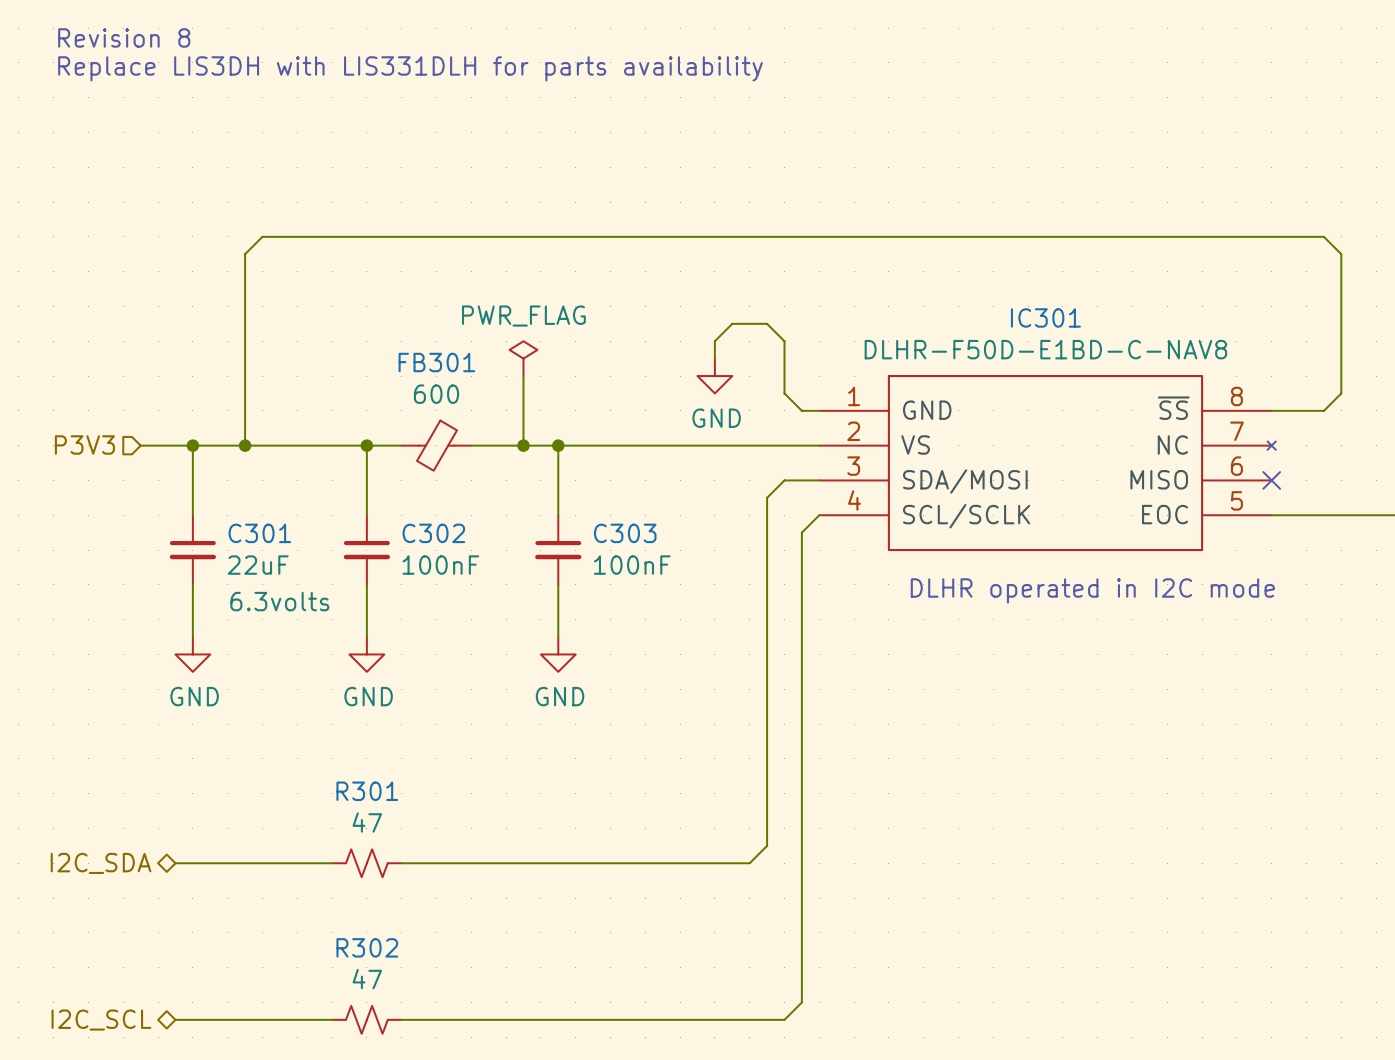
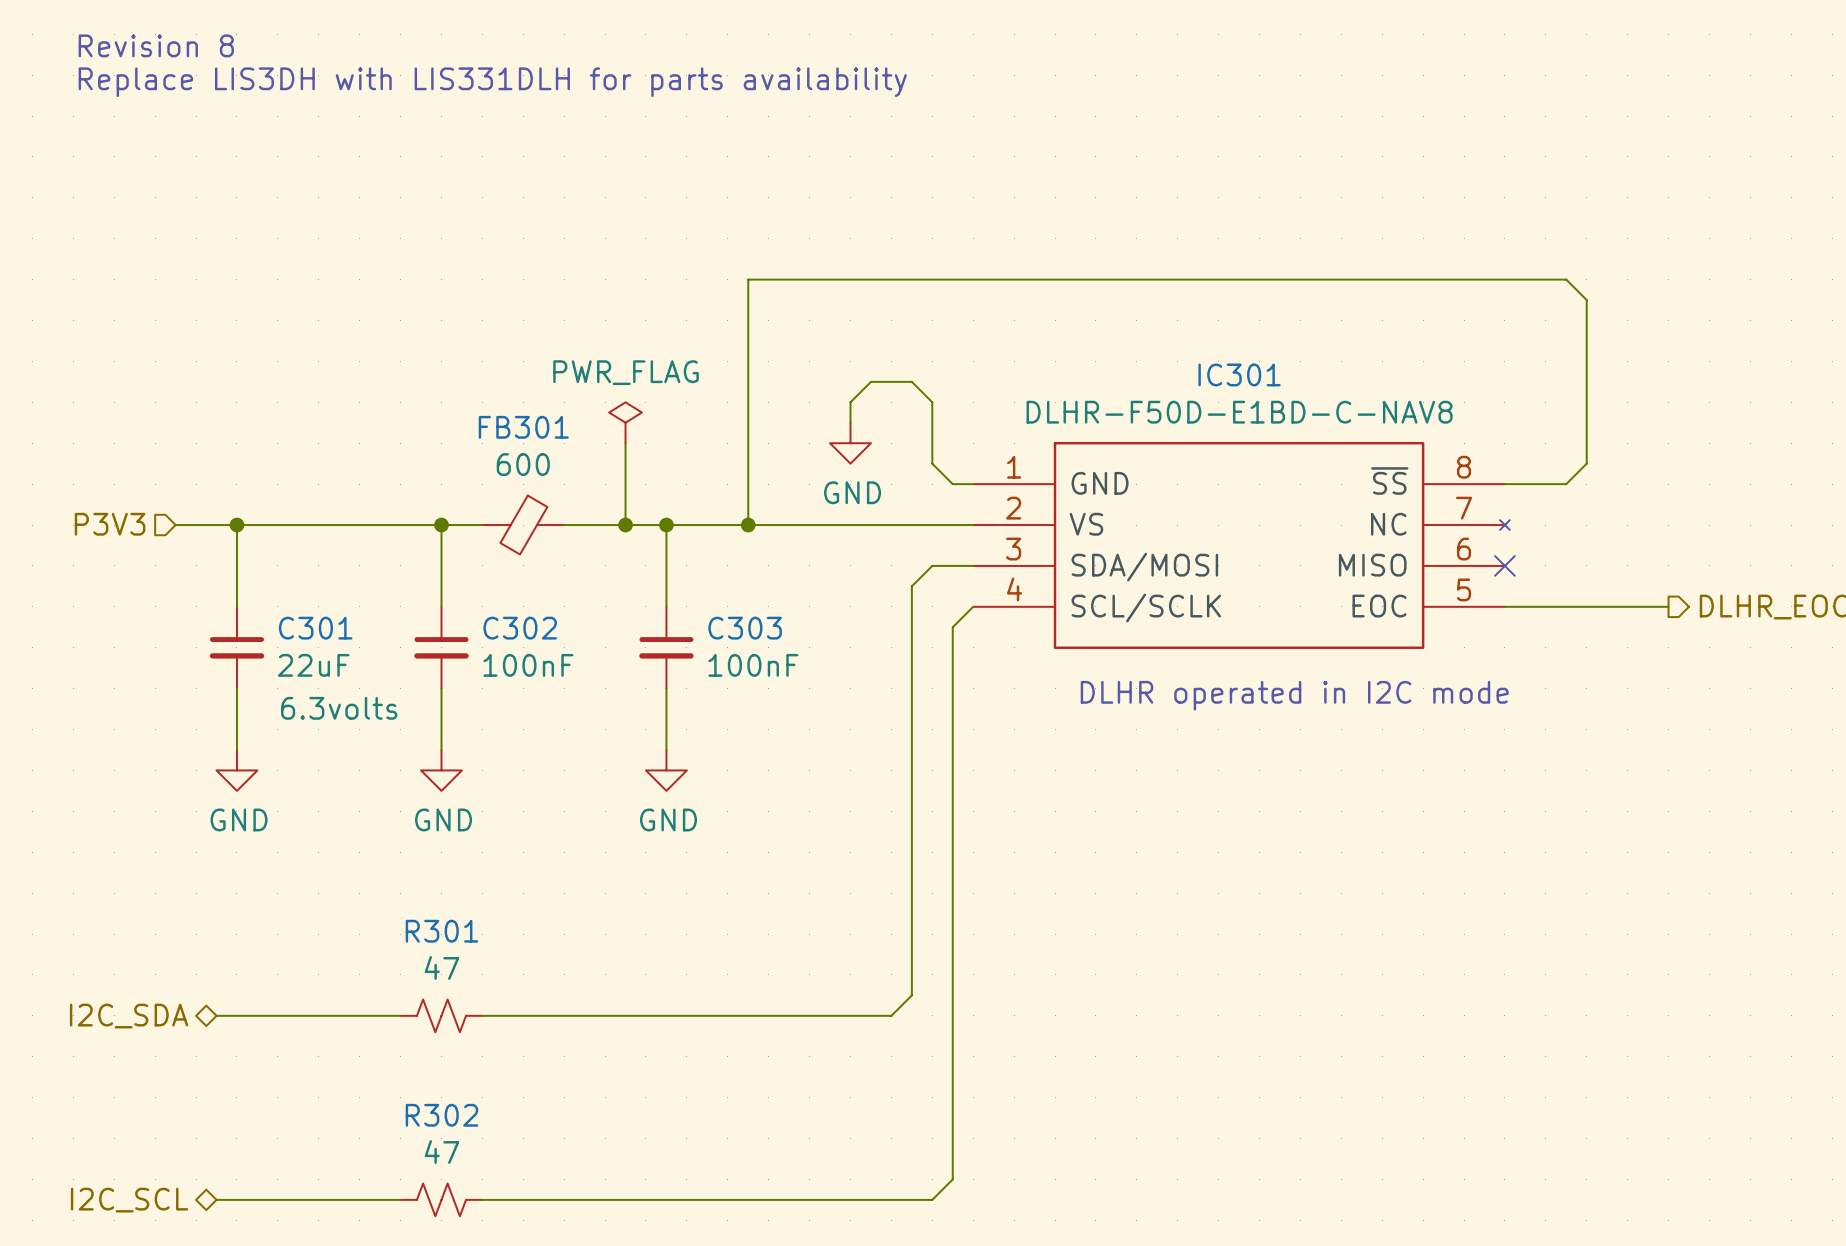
wire: (627, 236) (262, 236) (245, 254) (245, 445) -> (748, 279) (748, 525)
junction: (245, 445) -> none
junction: none -> (748, 525)

